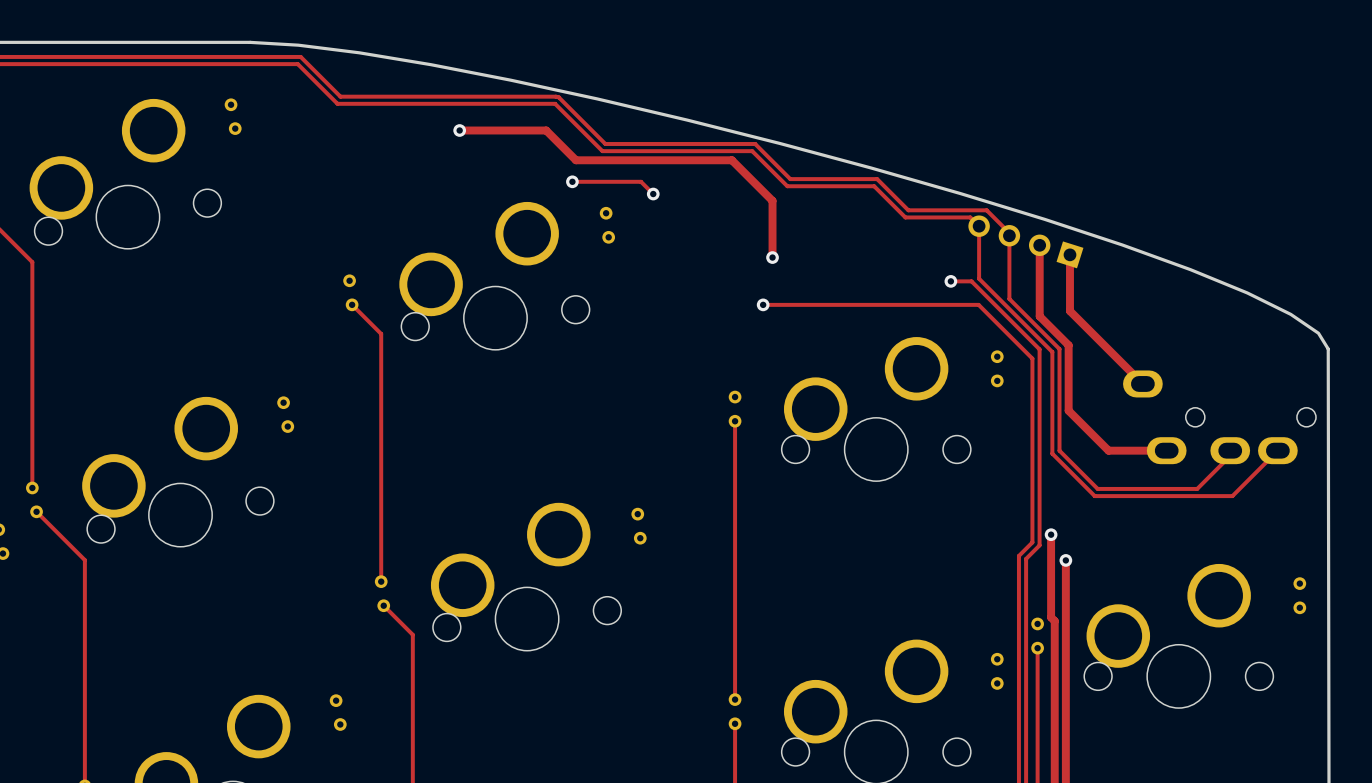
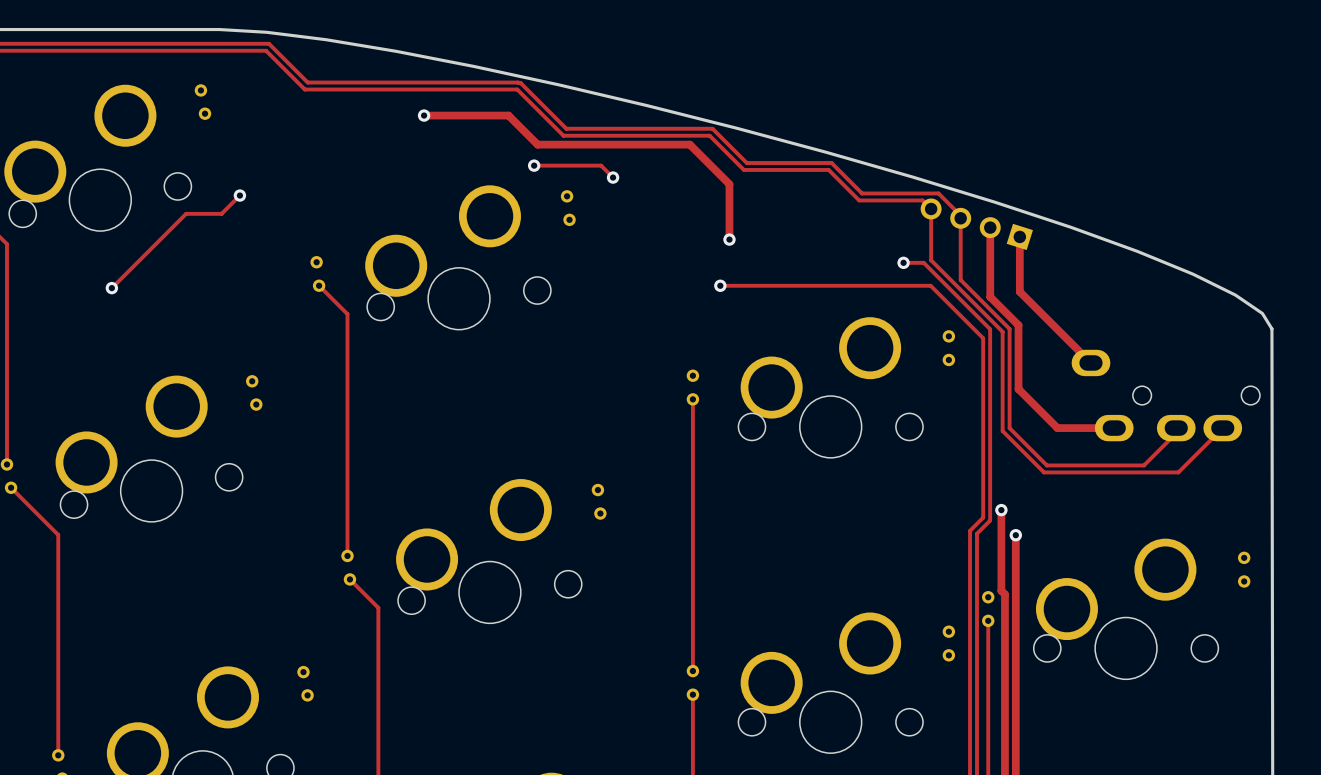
track: none -> (239, 195) (221, 213) (186, 213) (111, 288)
via: none -> (239, 195)
via: none -> (111, 288)

